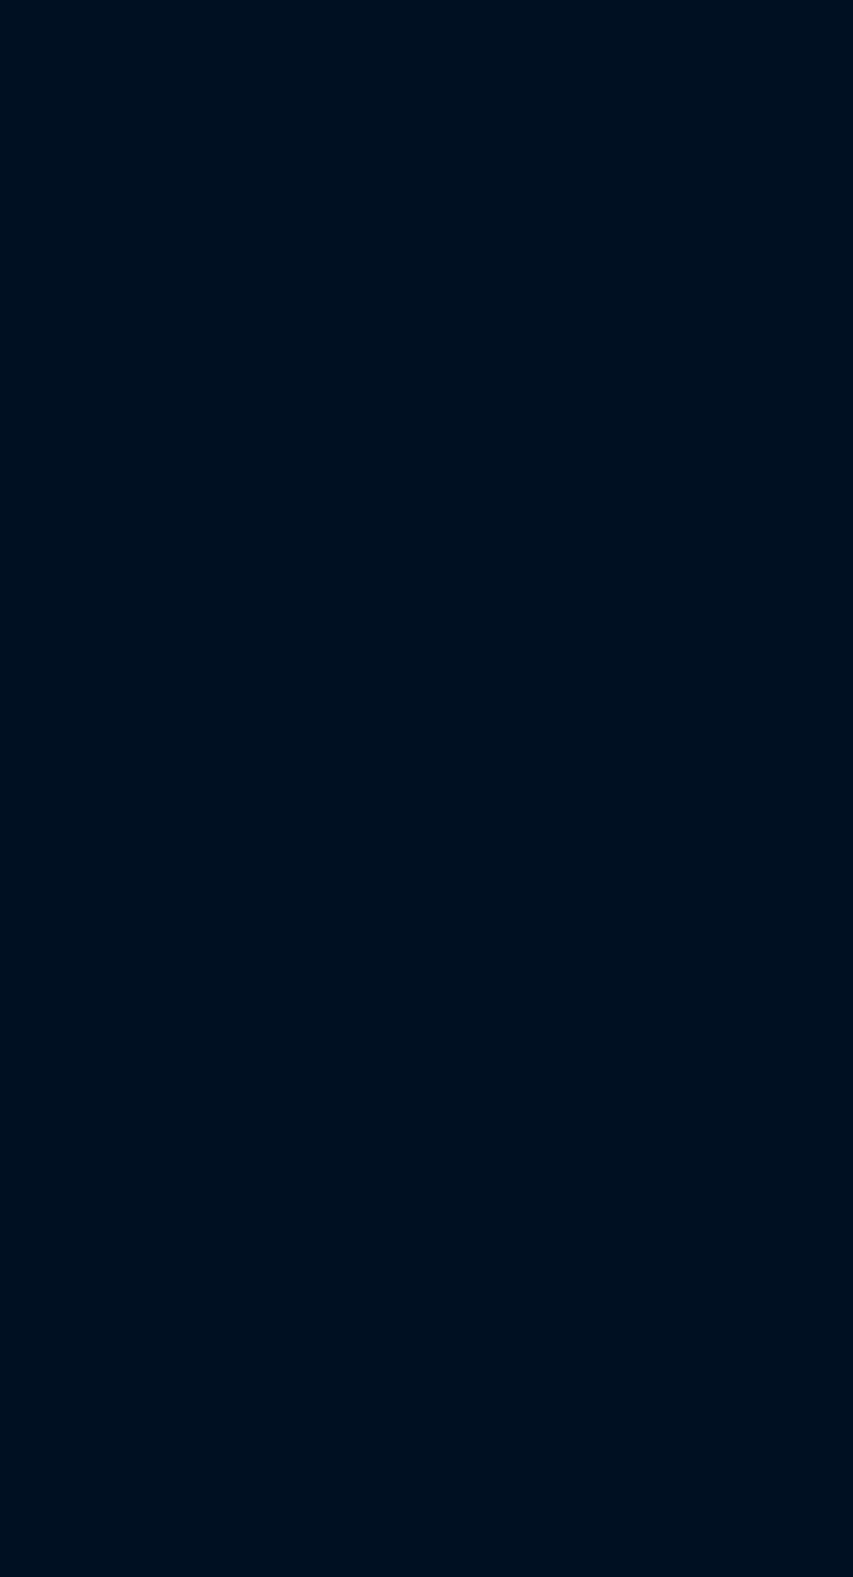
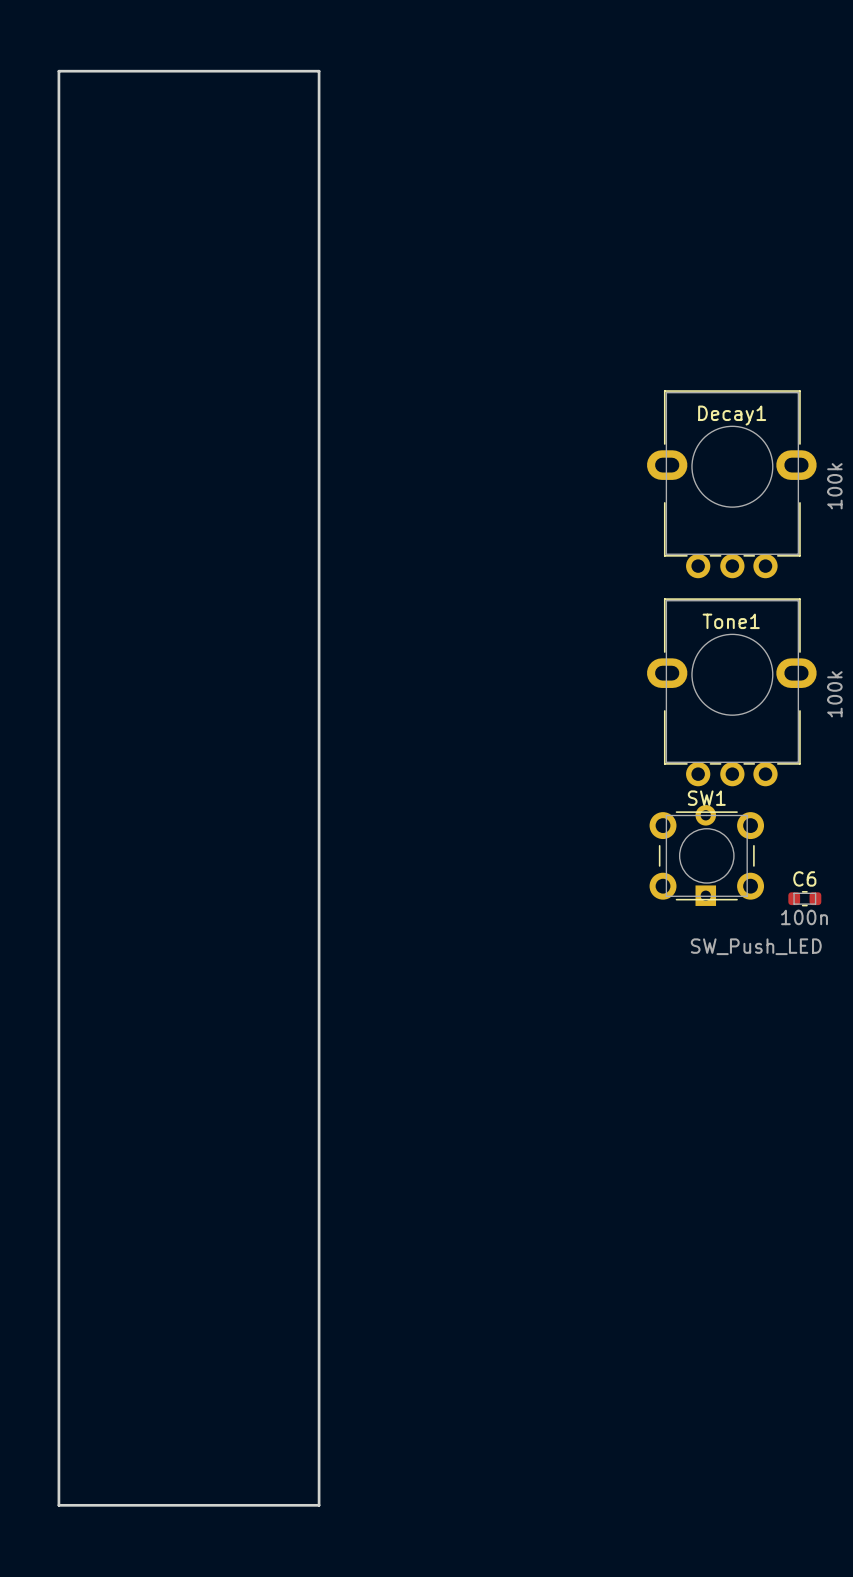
board edge: none -> (58, 71) (58, 1505) (319, 1505) (319, 71) (58, 71)
Decay1: none -> 100k (731, 484)
Tone1: none -> 100k (731, 692)
SW1: none -> SW_Push_LED (706, 855)
C6: none -> 100n (804, 898)

